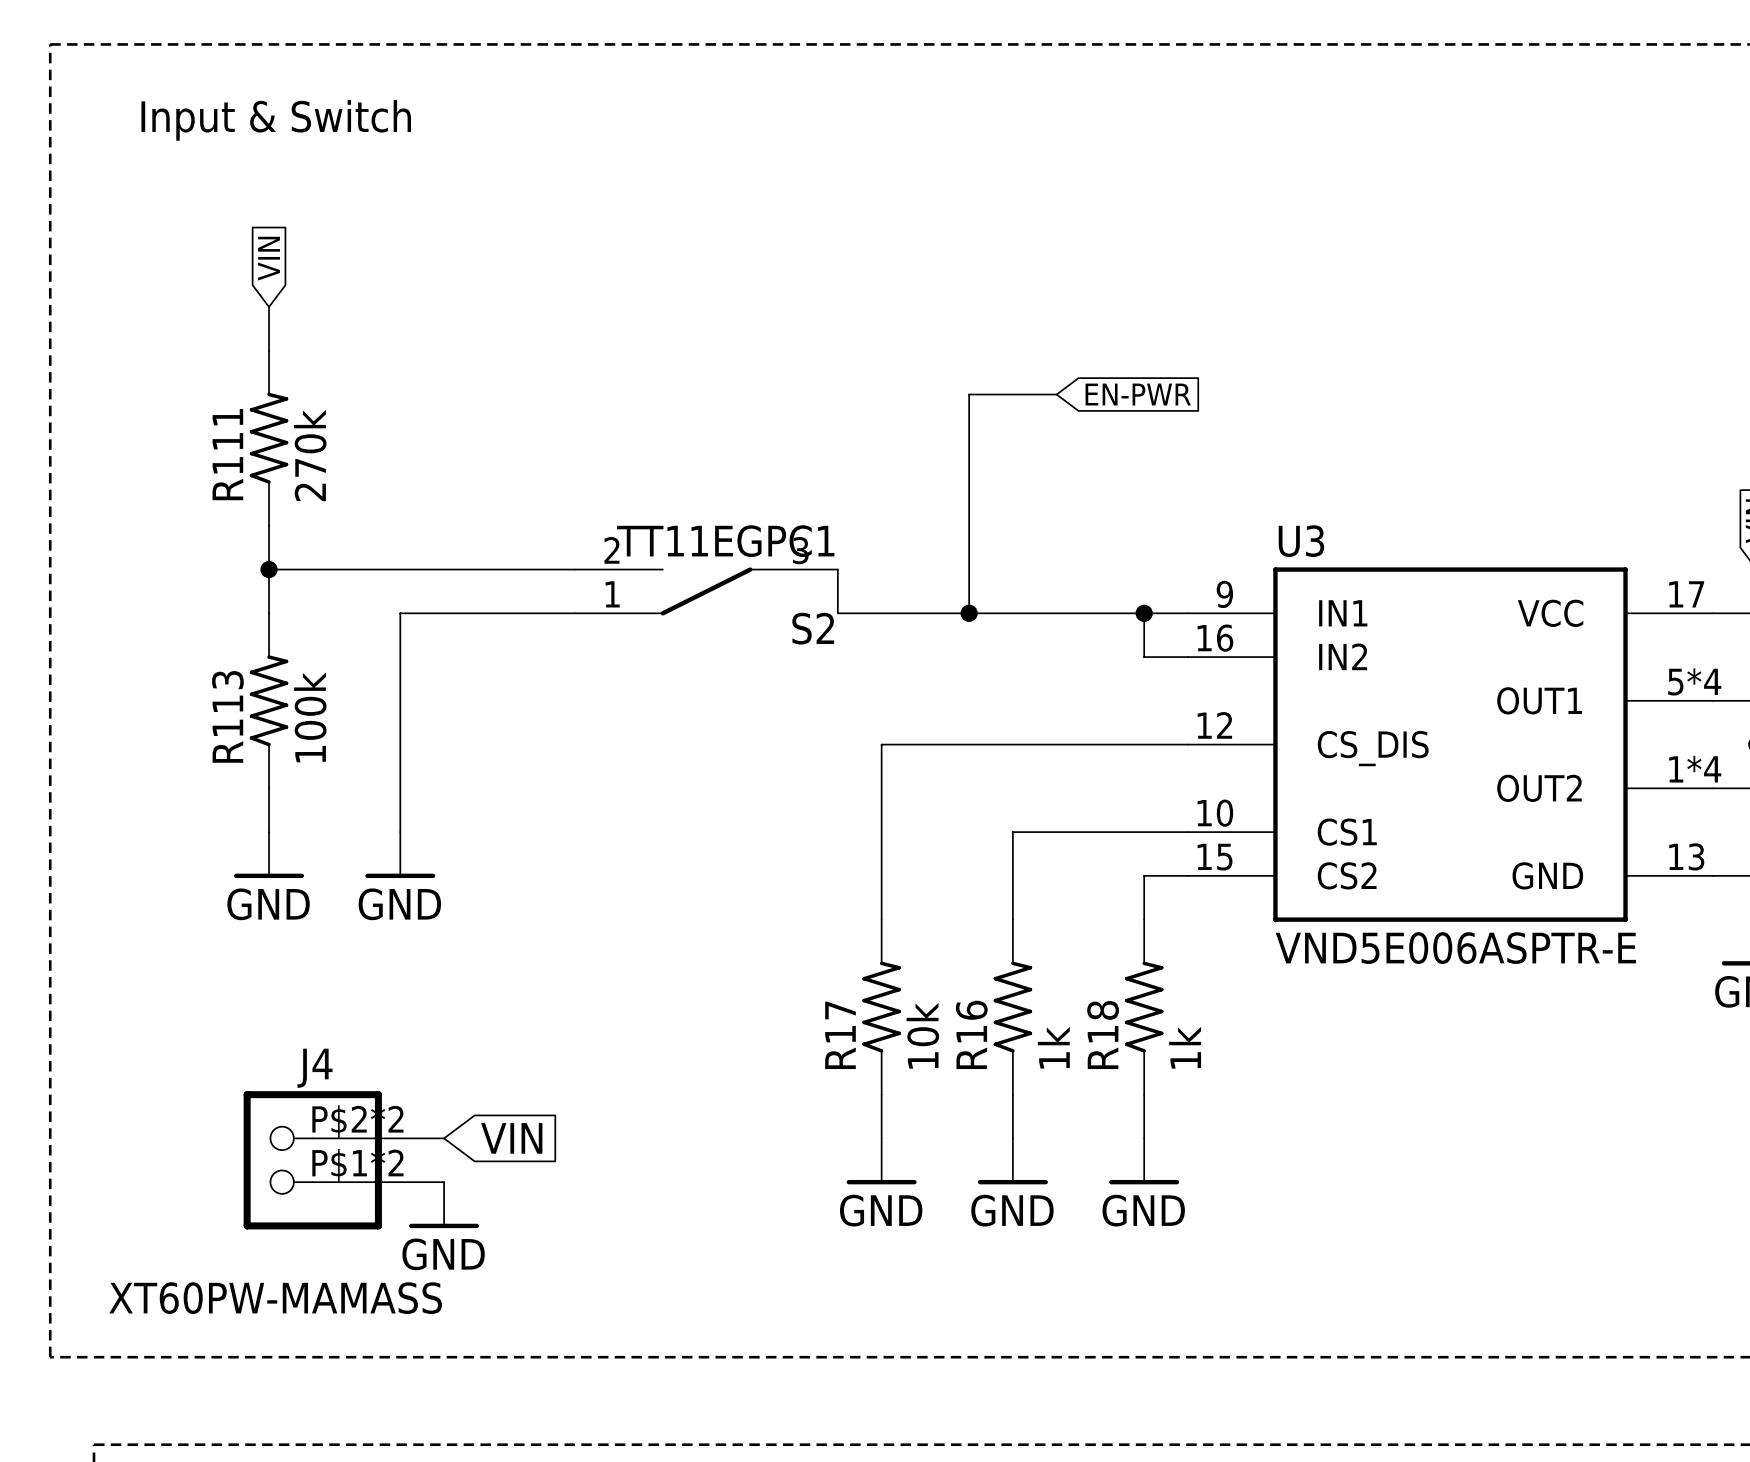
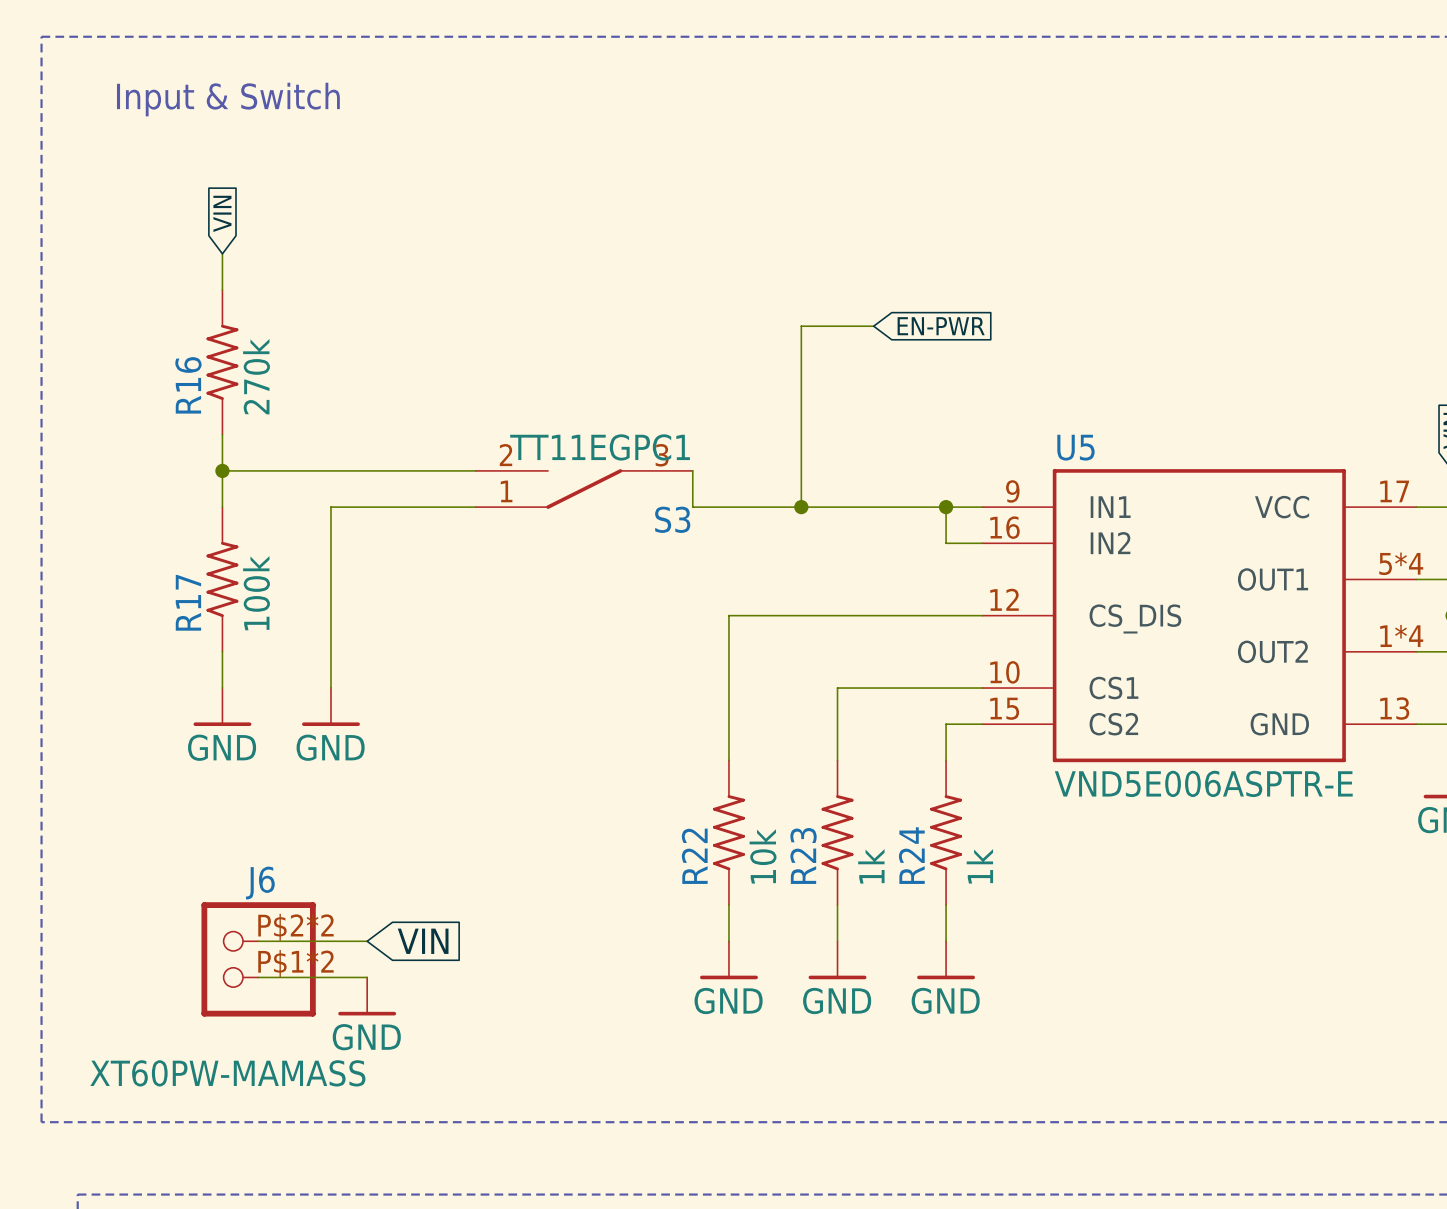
R111 name: R111 (227, 454) -> R16 (188, 385)
U3 name: U3 (1301, 541) -> U5 (1075, 447)
S2 name: S2 (813, 628) -> S3 (672, 519)
R113 name: R113 (227, 716) -> R17 (188, 602)
R16 name: R16 (971, 1034) -> R23 (803, 855)
R17 name: R17 (840, 1035) -> R22 (694, 856)
R18 name: R18 (1103, 1035) -> R24 (911, 855)
J4 name: J4 (315, 1068) -> J6 (260, 883)

